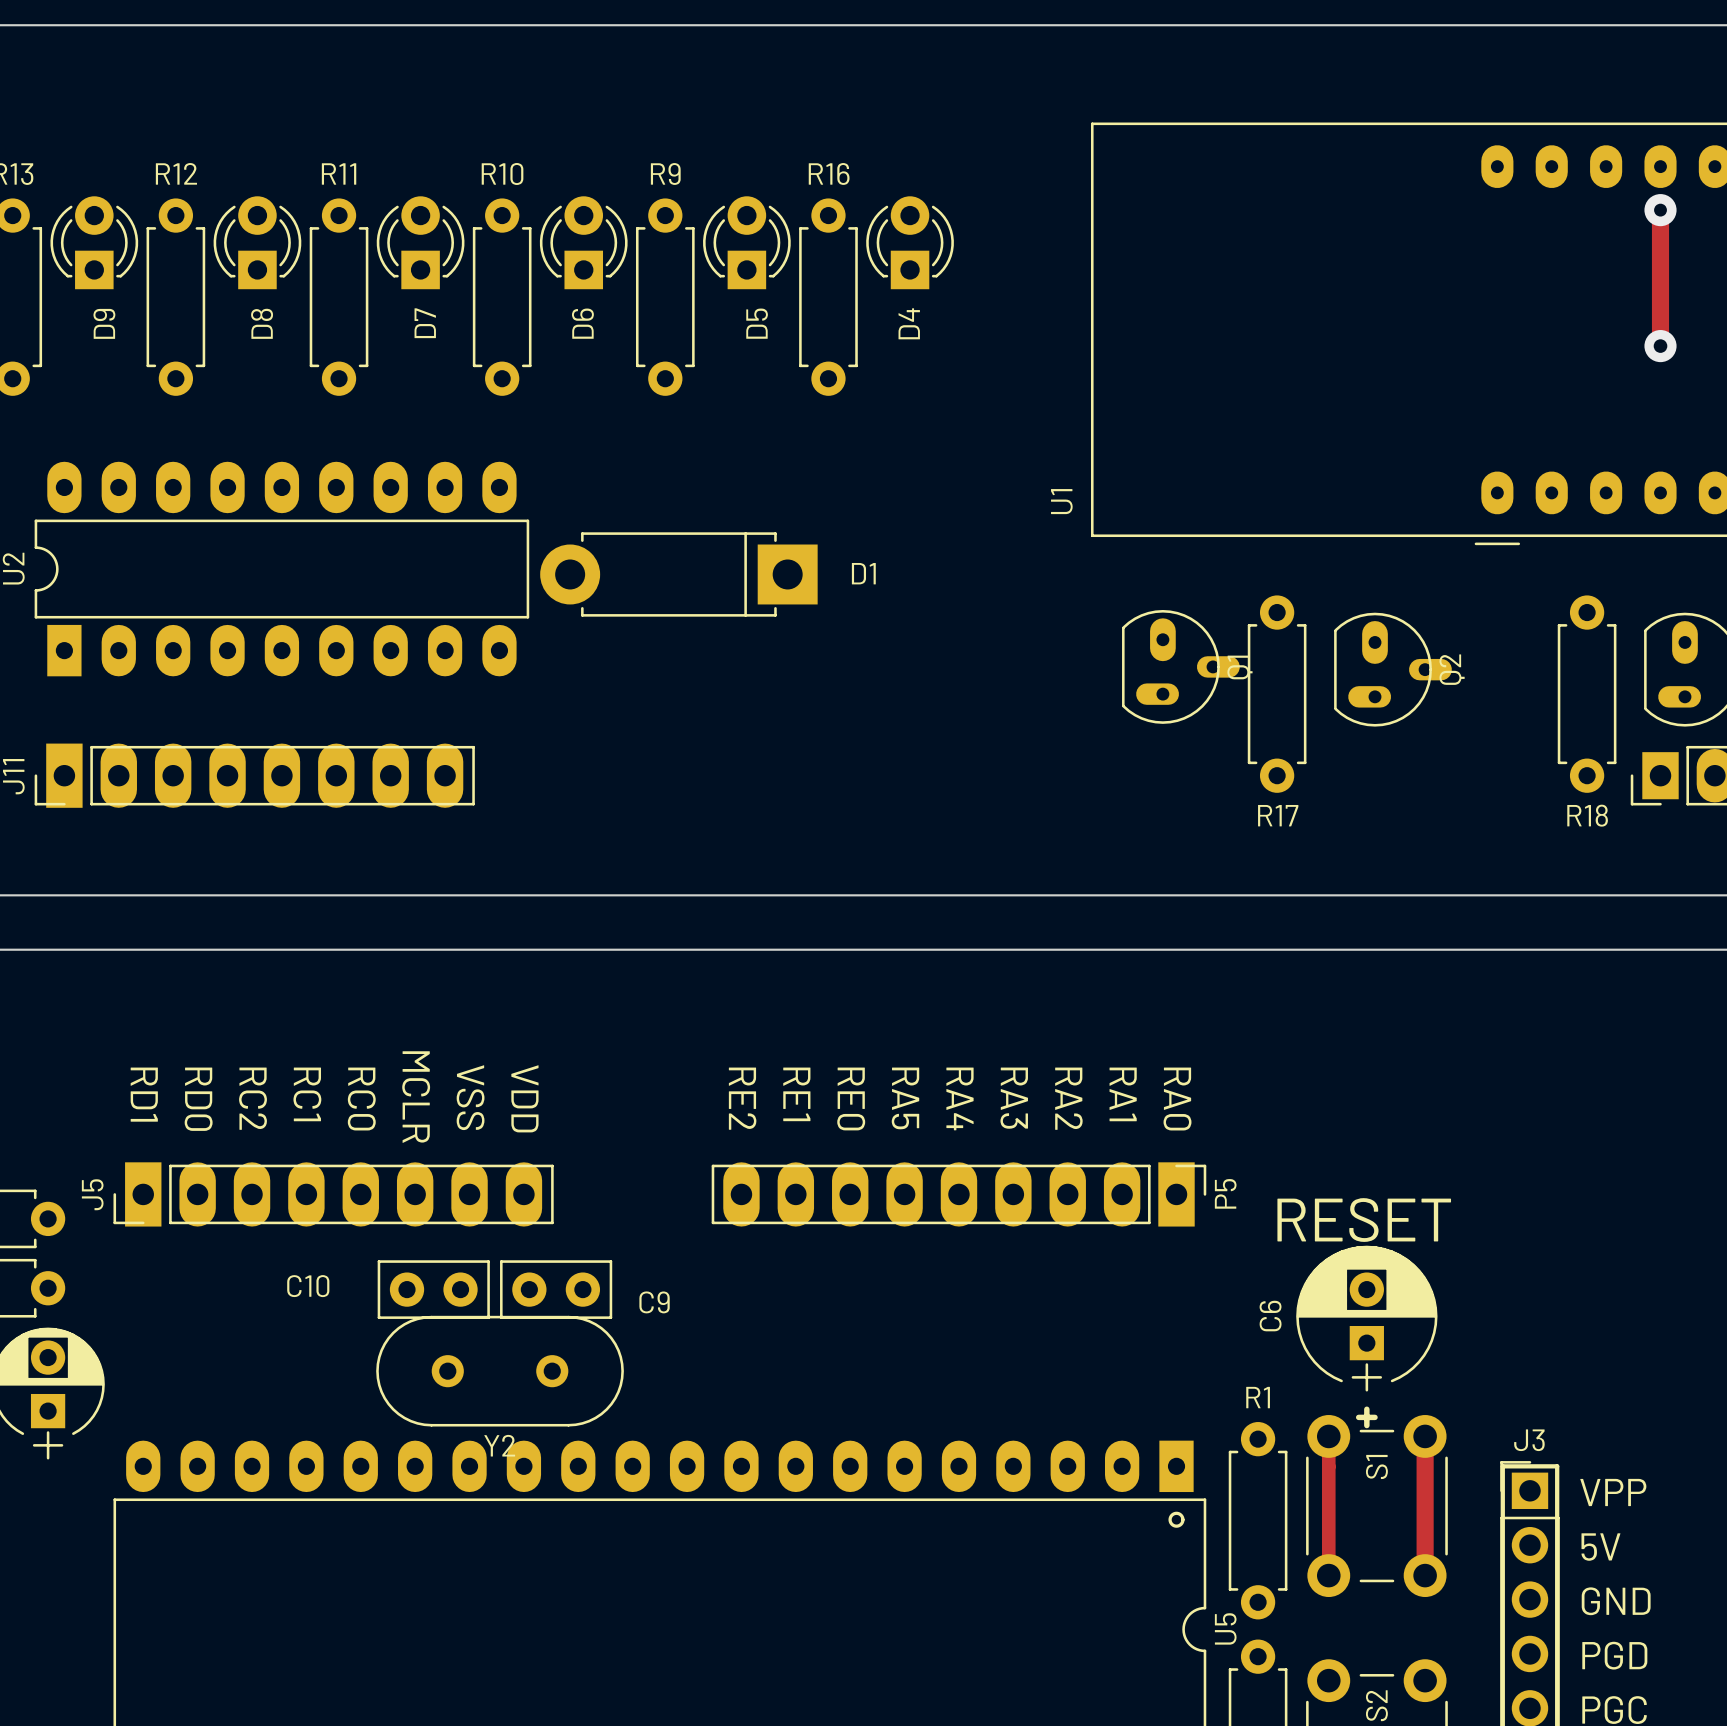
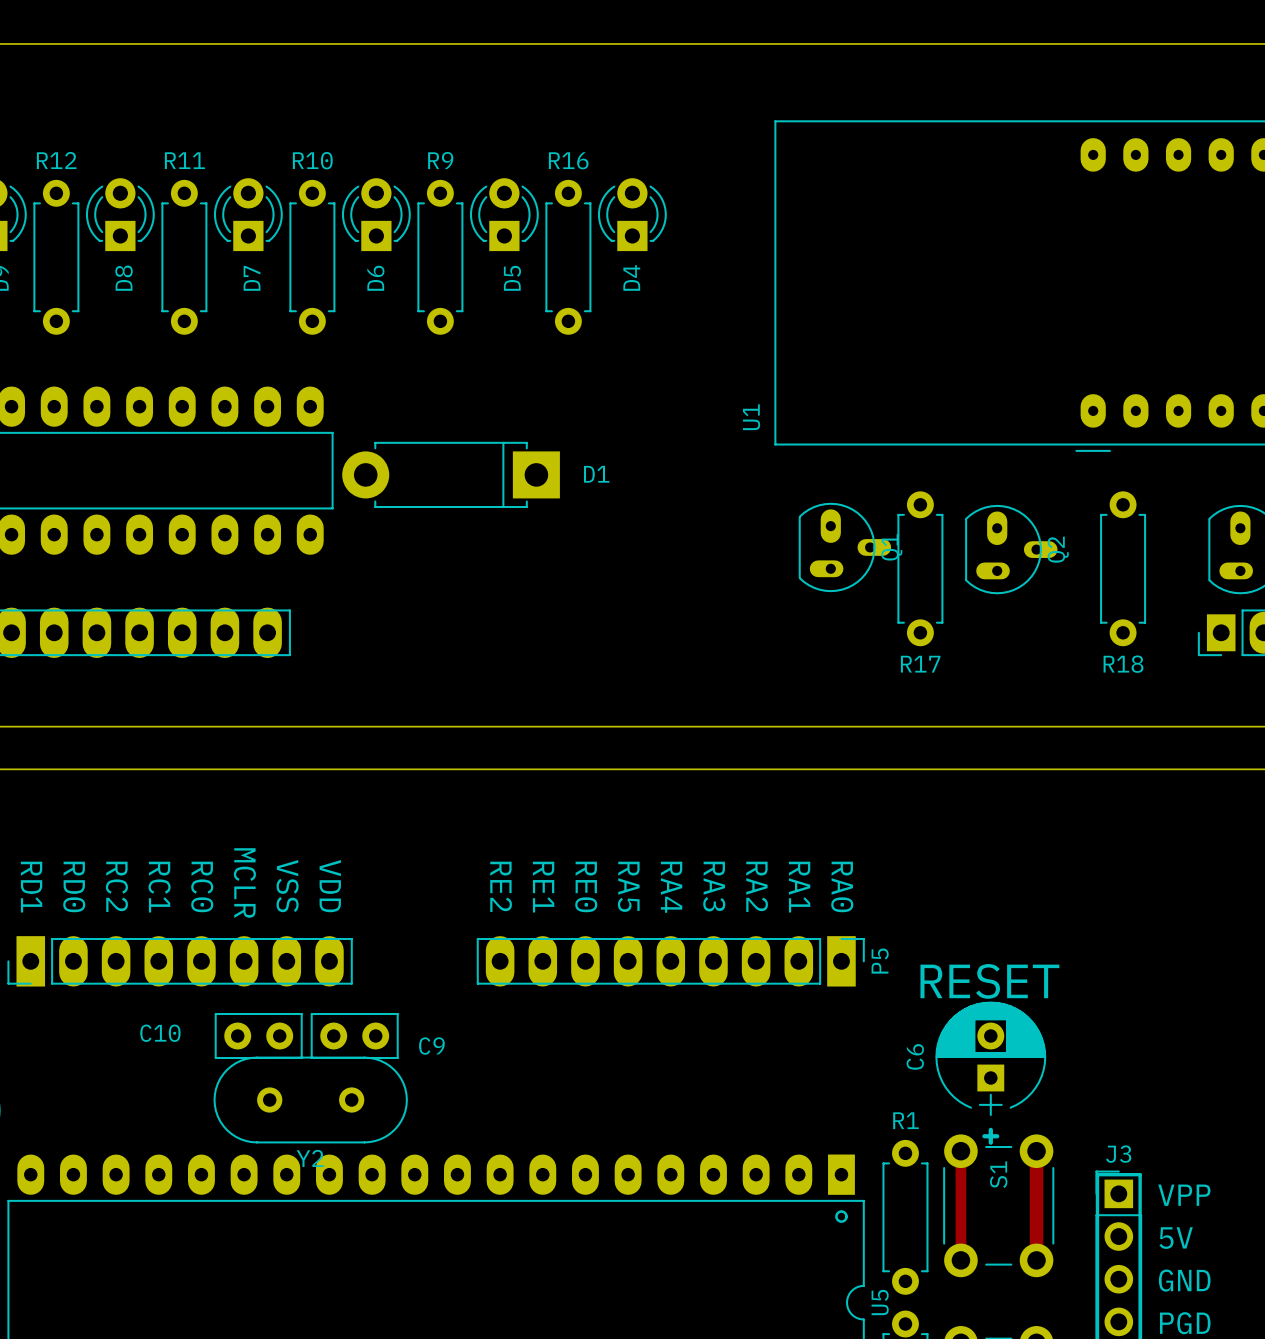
track: (1660, 210) (1660, 346) -> none
via: (1660, 210) -> none
via: (1660, 346) -> none
R18 position: (1587, 694) -> (1123, 568)

